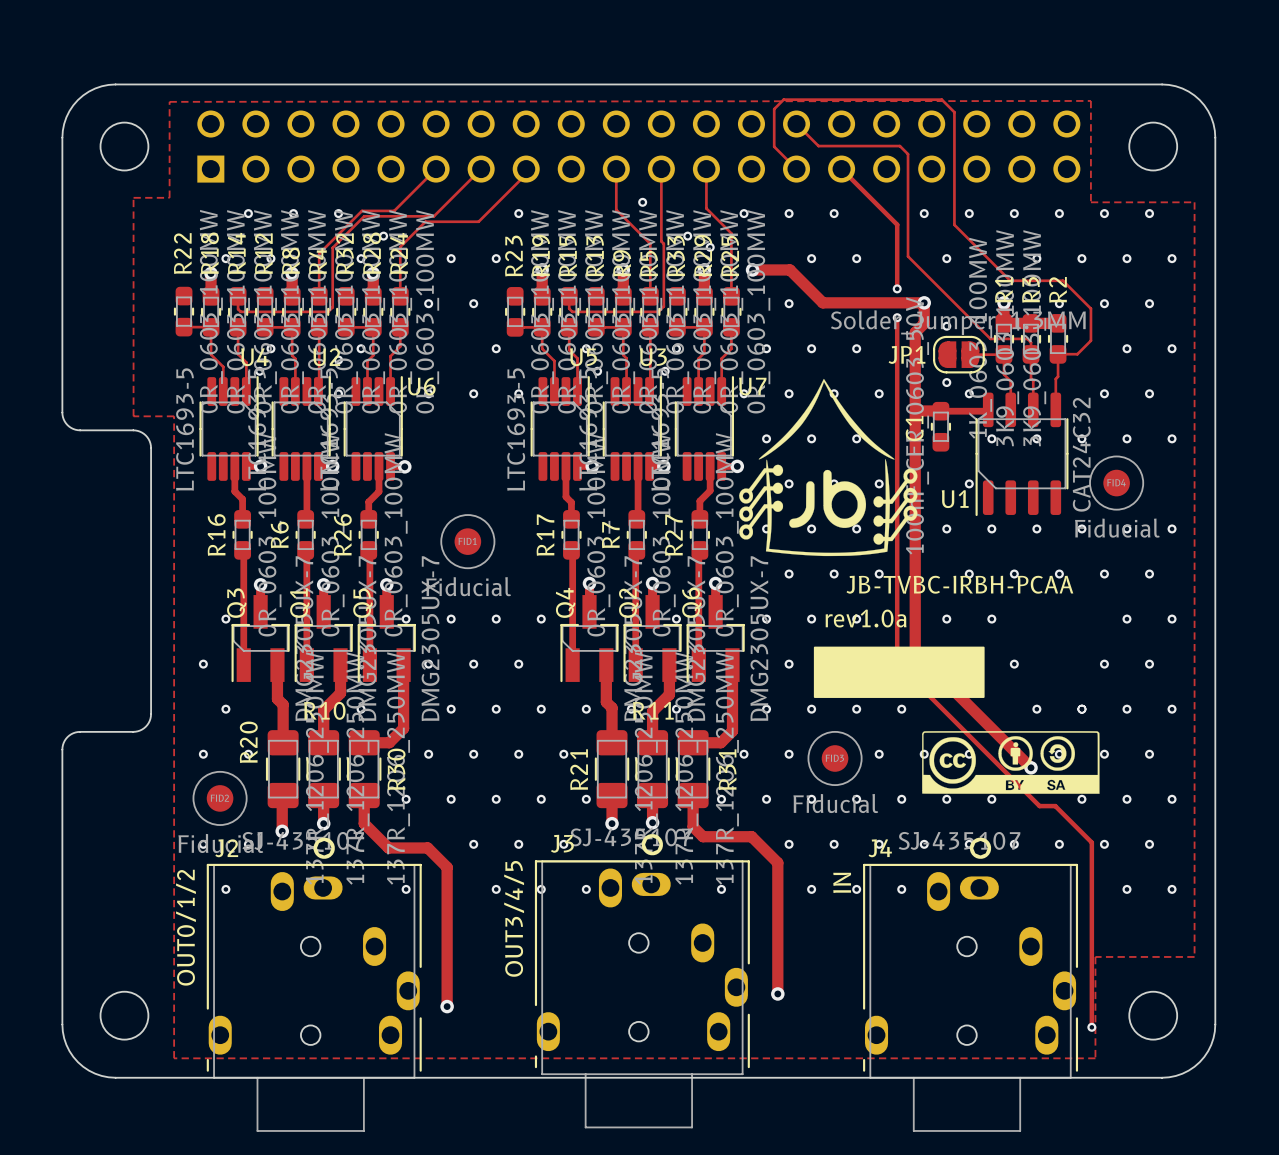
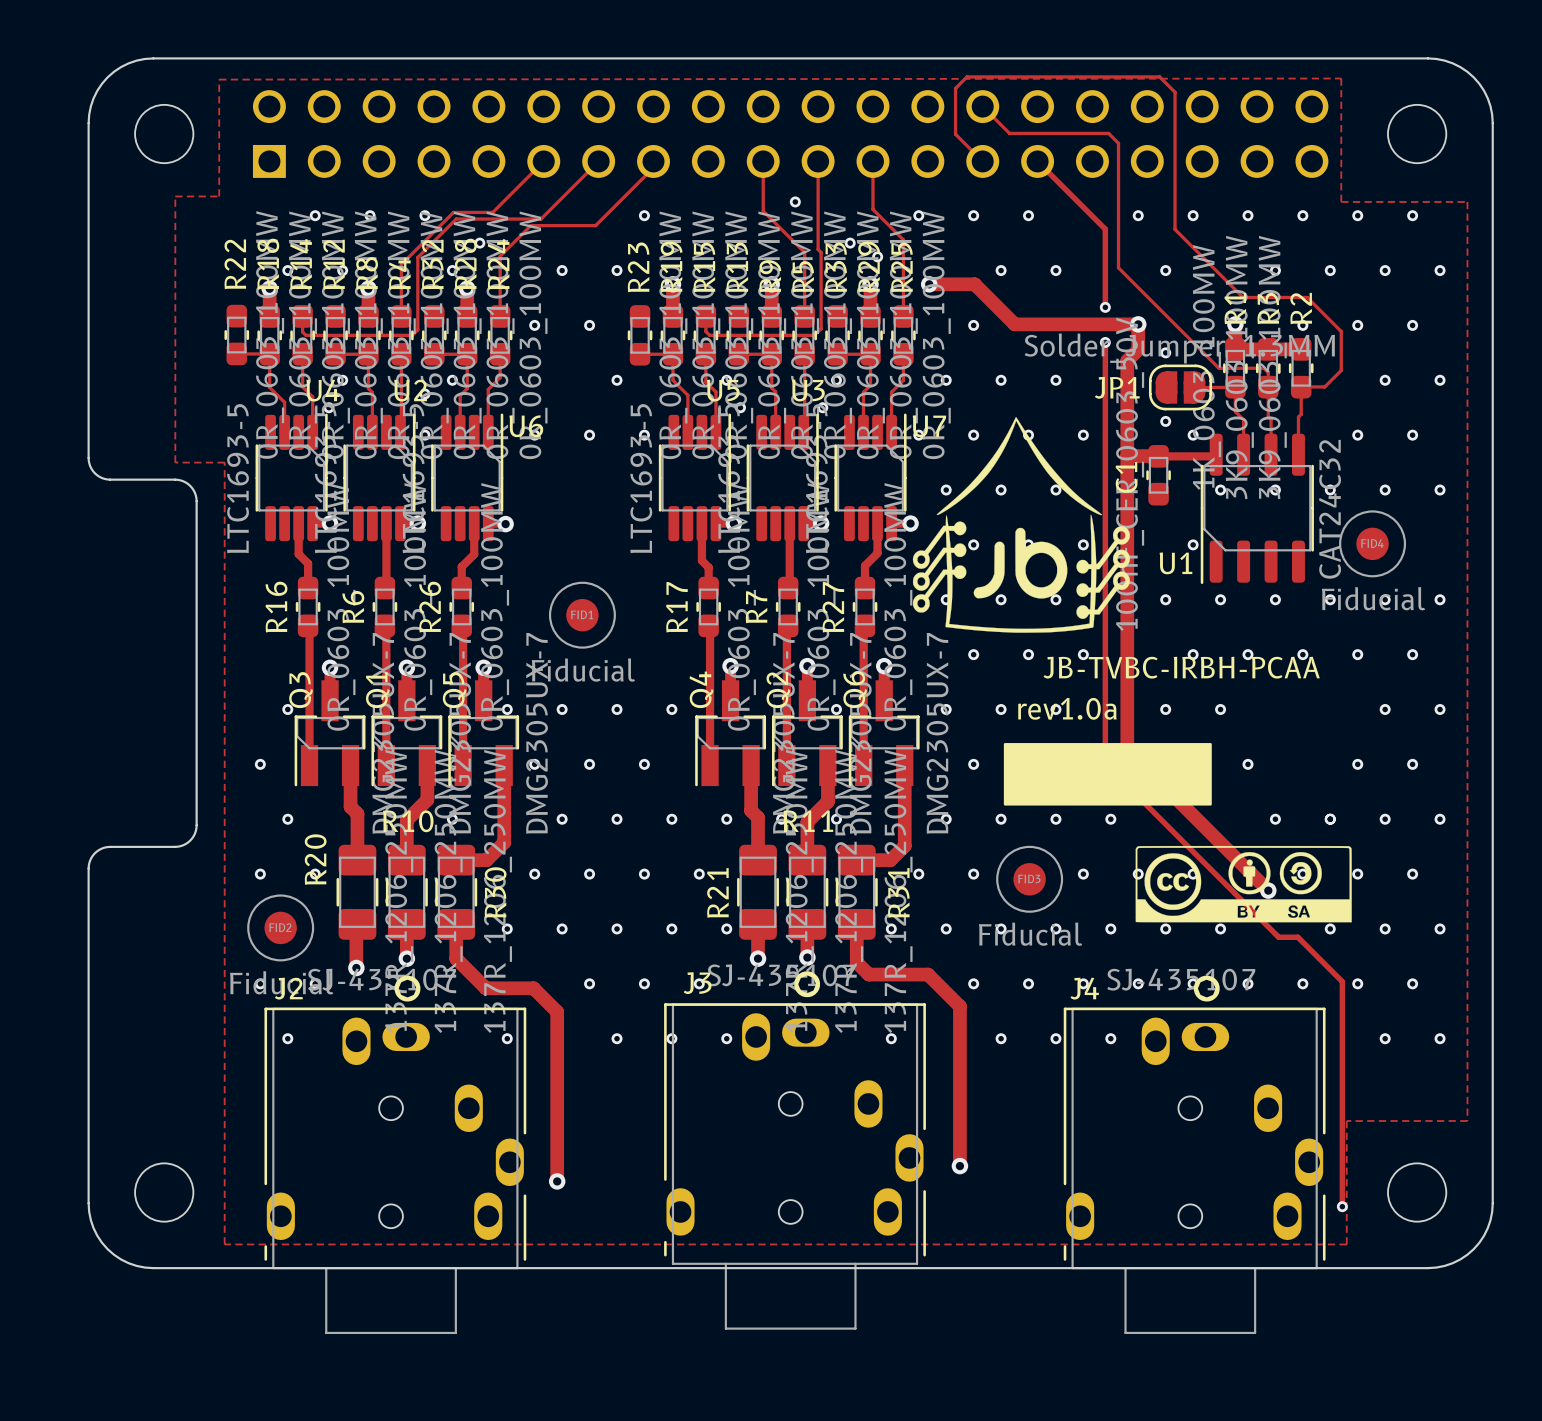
text: IN (842, 882) -> none
text: OUT3/4/5 (514, 918) -> none
text: OUT0/1/2 (185, 927) -> none

